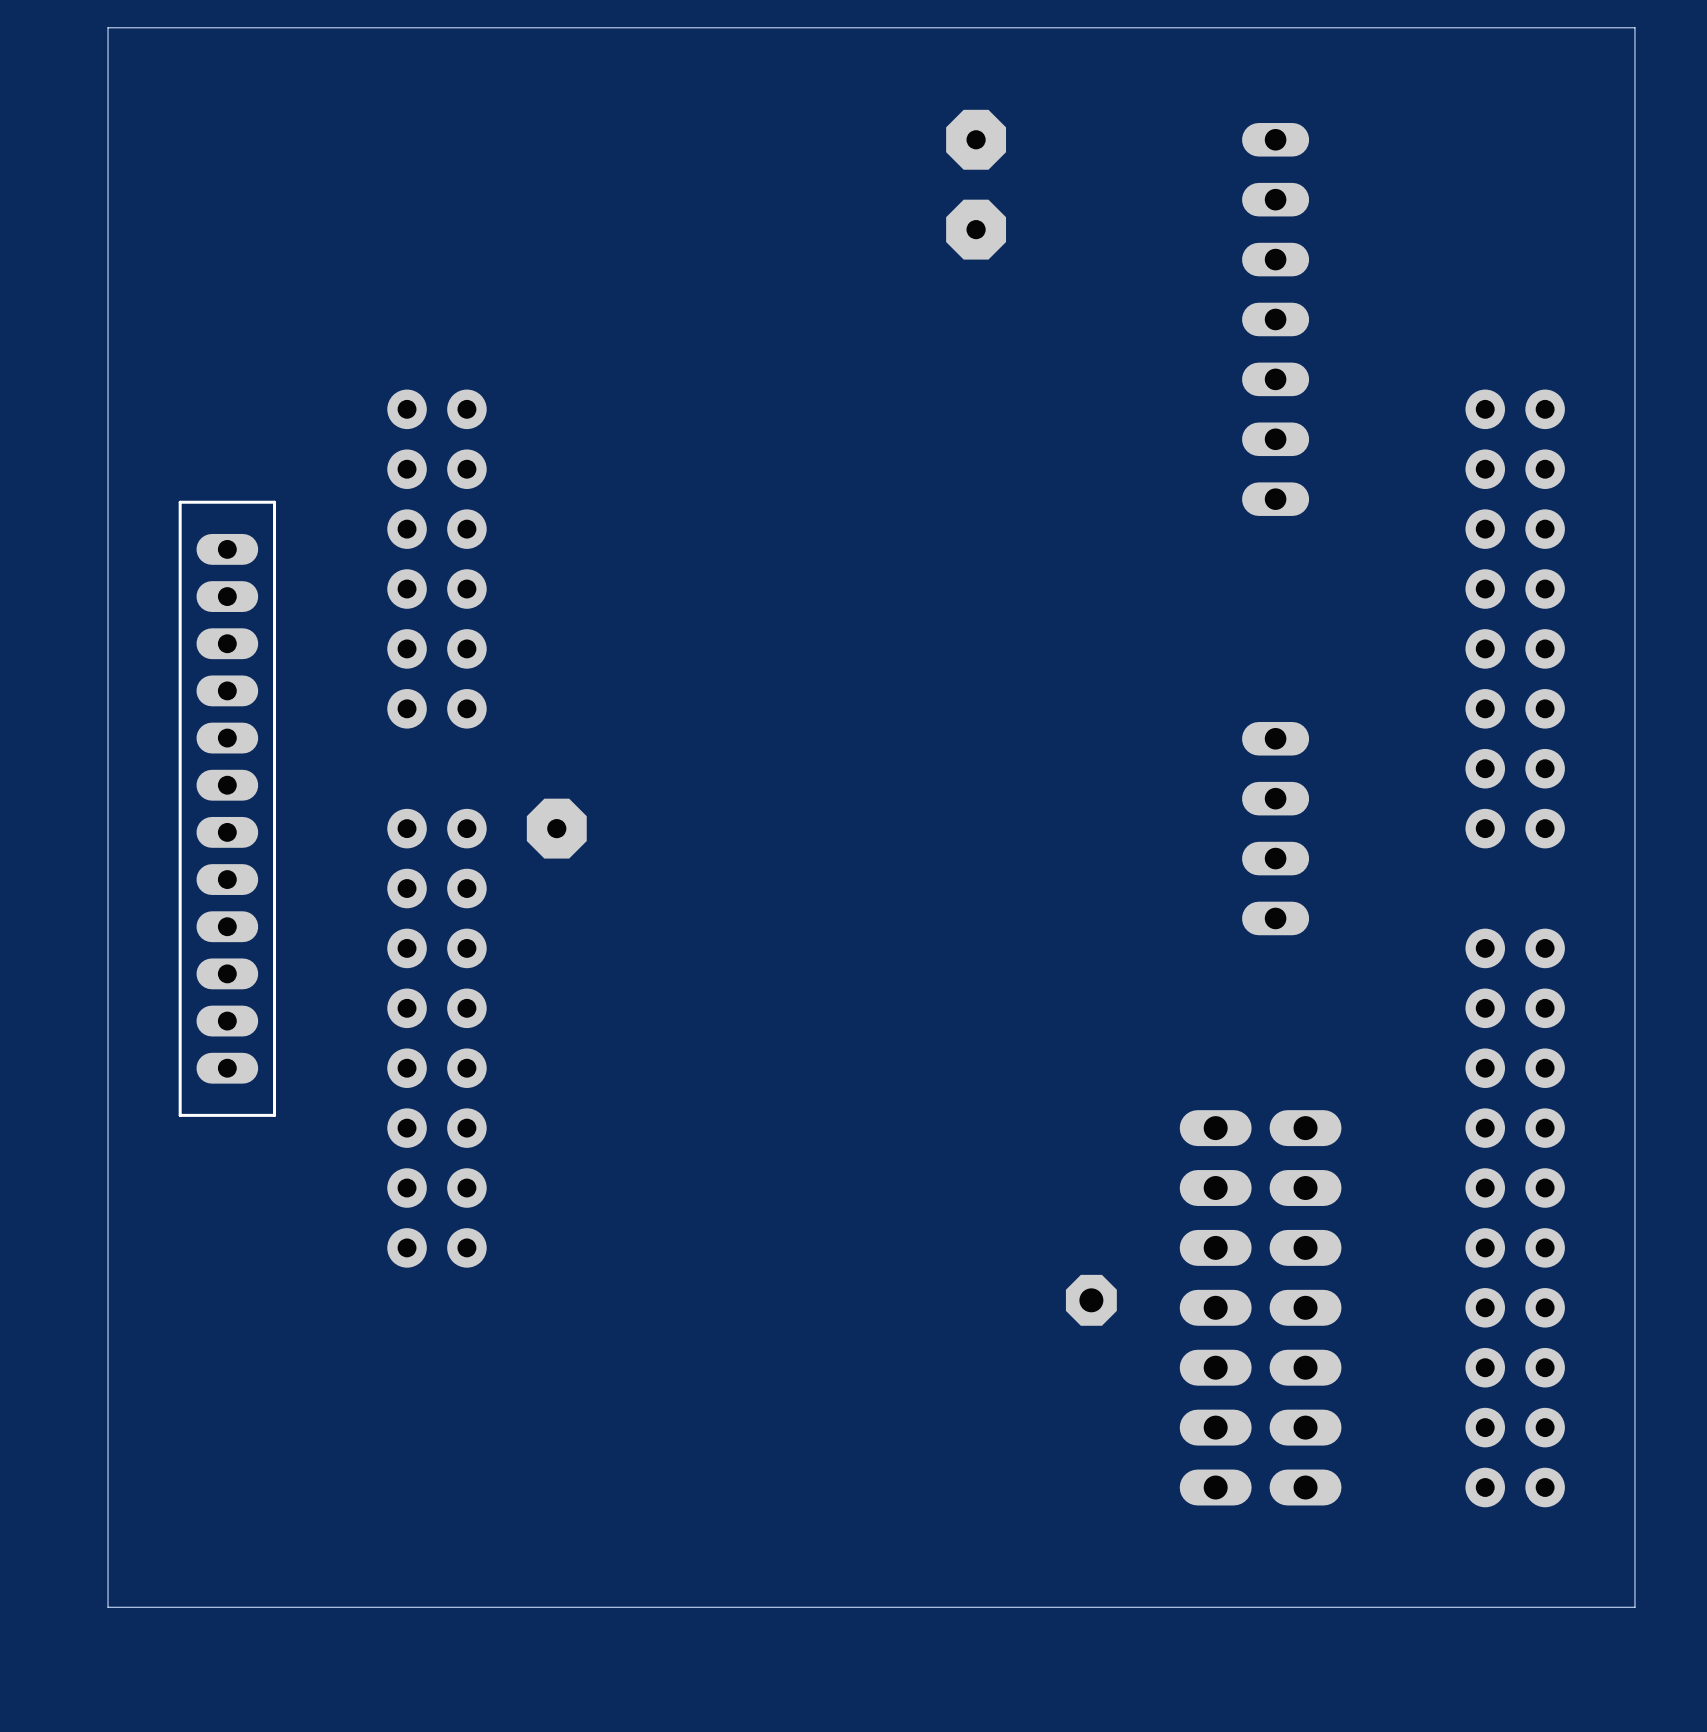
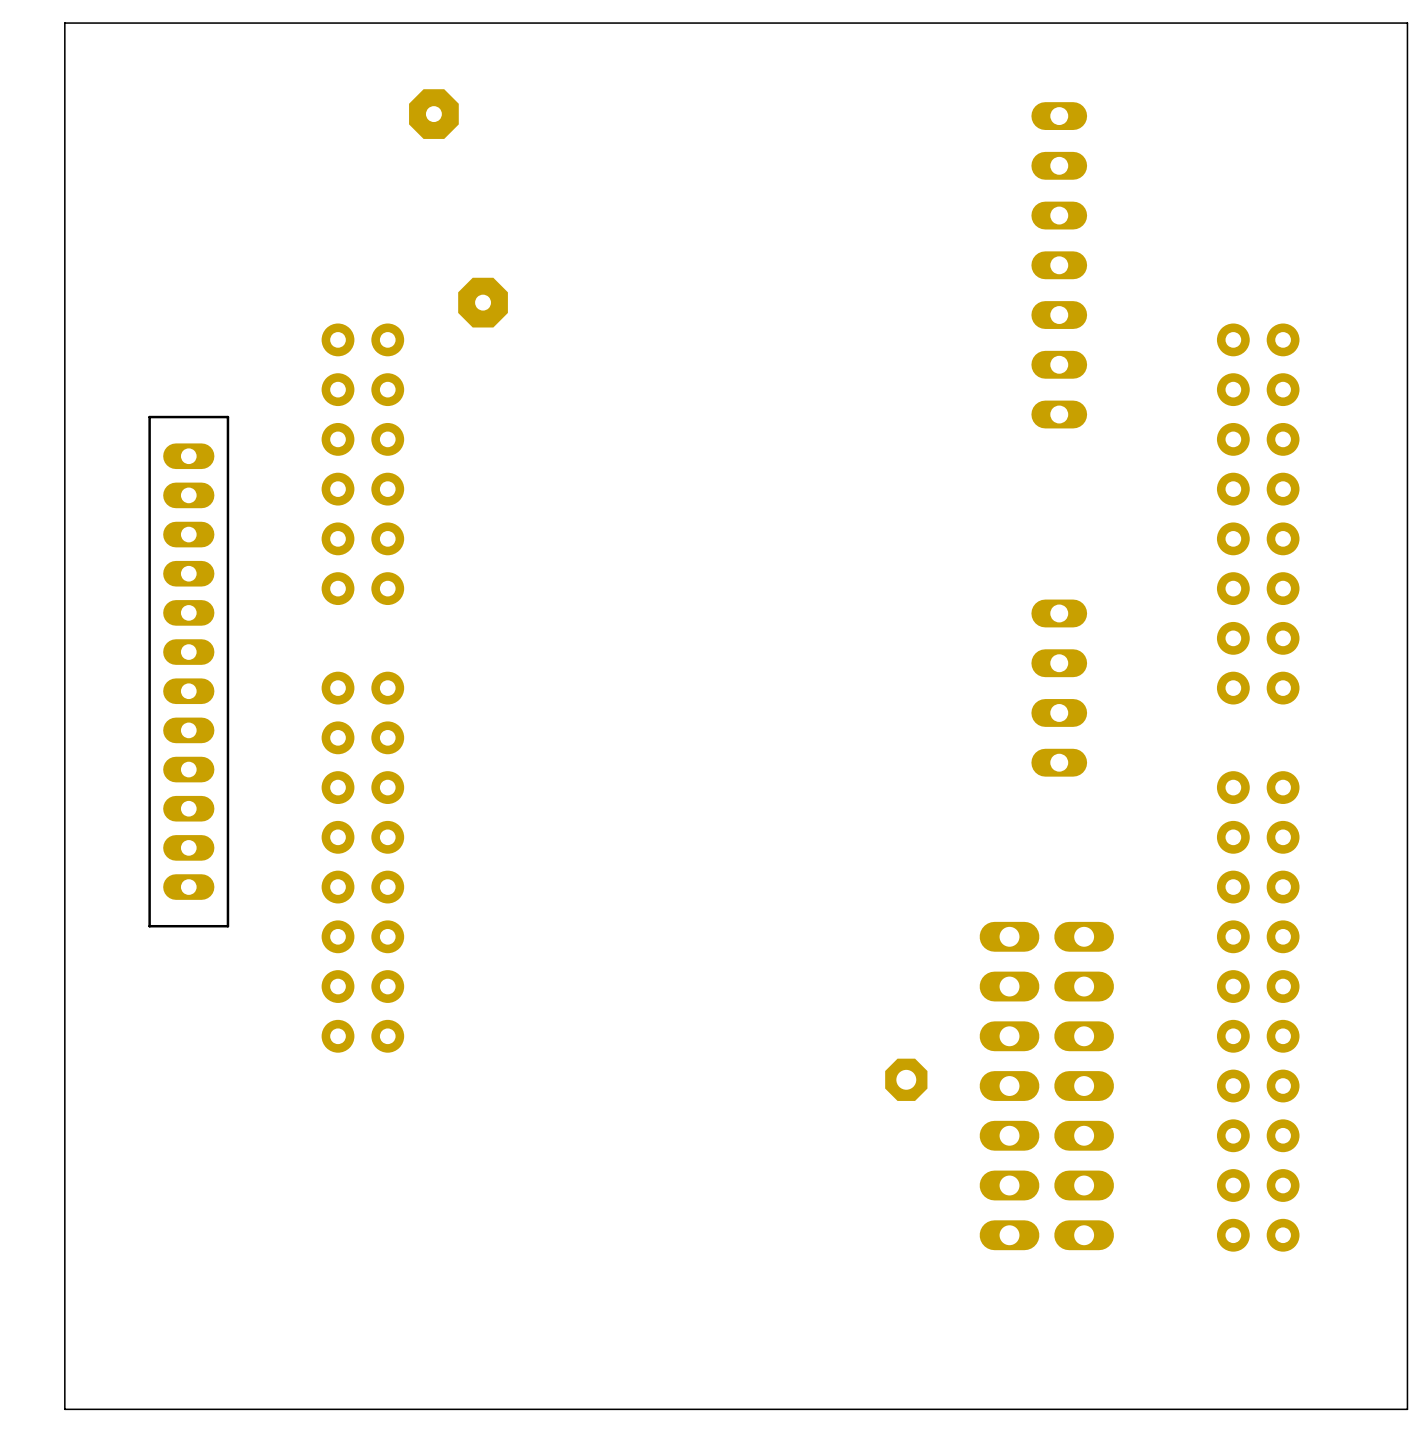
board edge: (1634, 27) (1634, 1607) (108, 1607) (108, 27) -> (1357, 23) (1407, 23) (1407, 1409) (64, 1409) (64, 23) (89, 23)
part: none -> (433, 114)
part: (976, 139) -> none
part: (976, 229) -> none
part: none -> (483, 302)
part: (556, 828) -> none

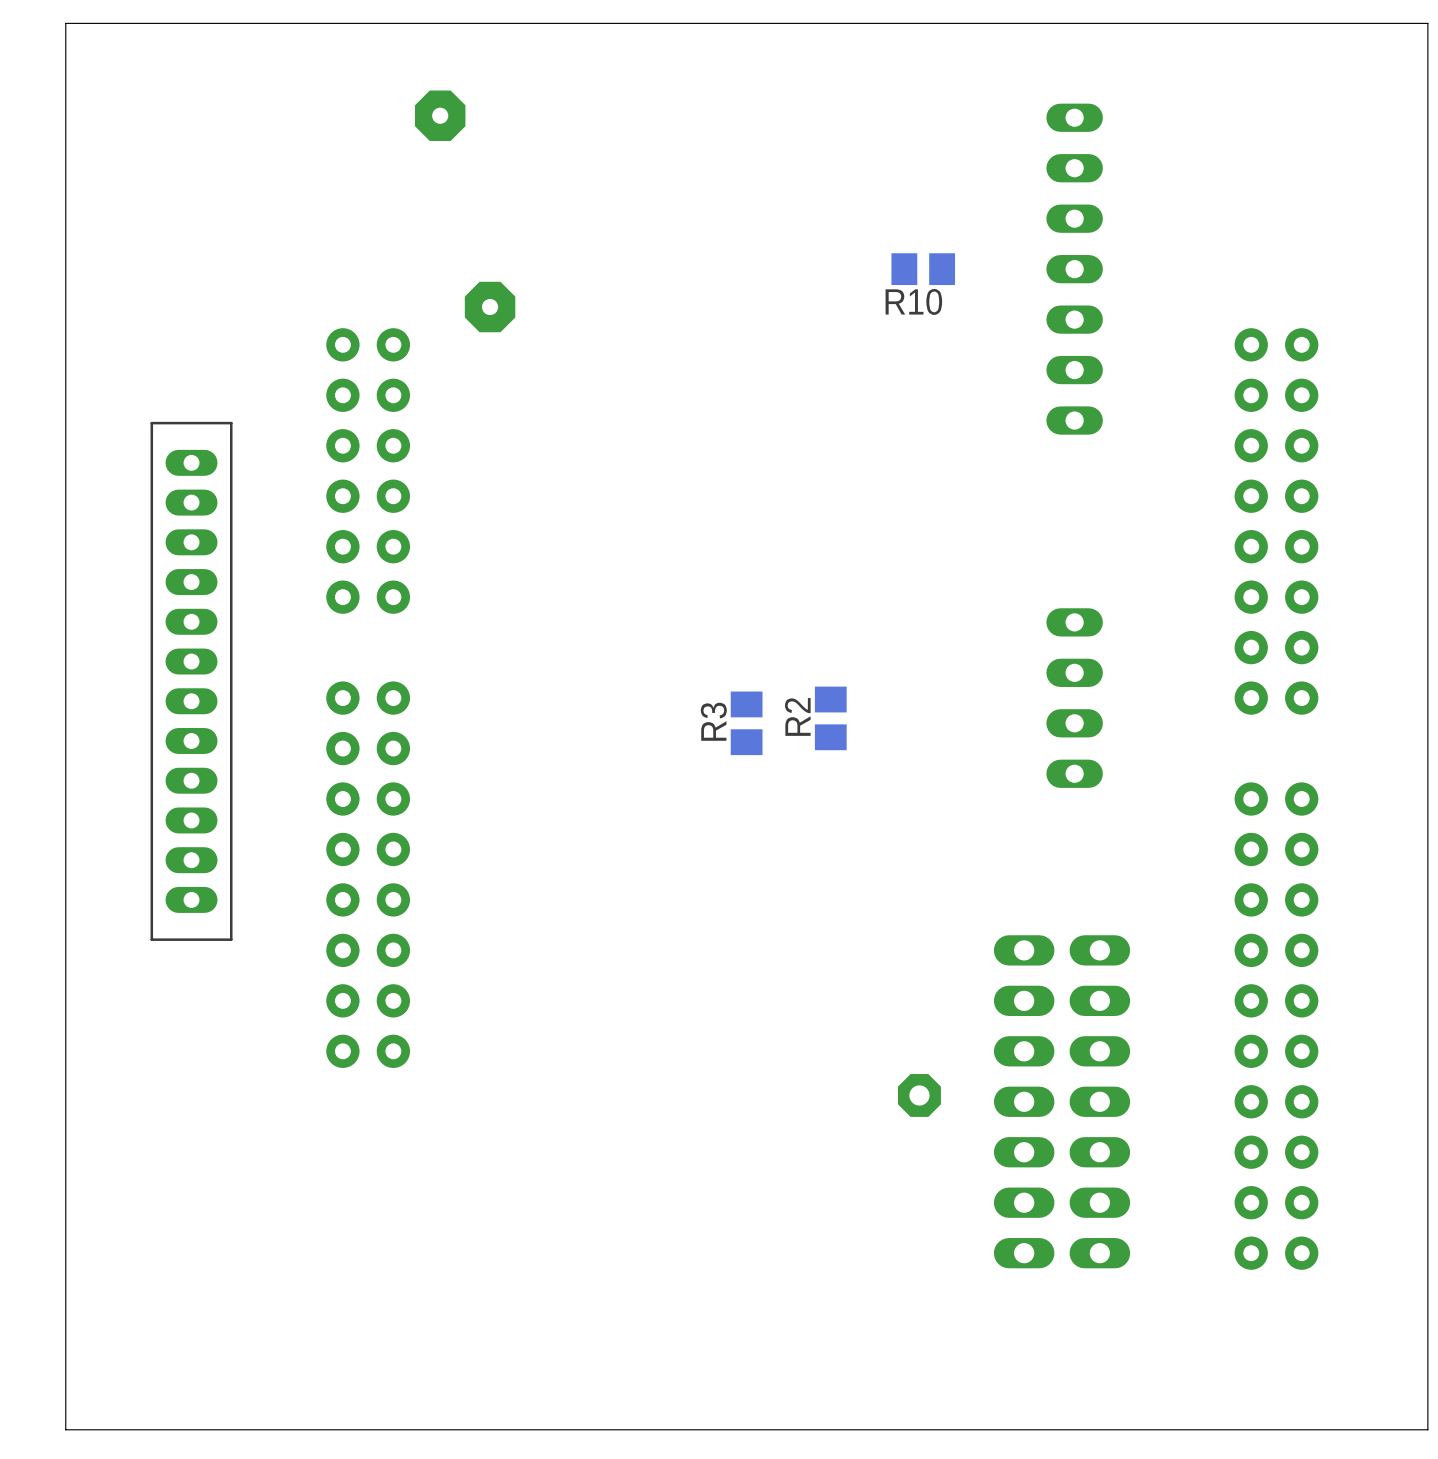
R10: none -> (923, 269)
R2: none -> (830, 718)
R3: none -> (746, 723)

